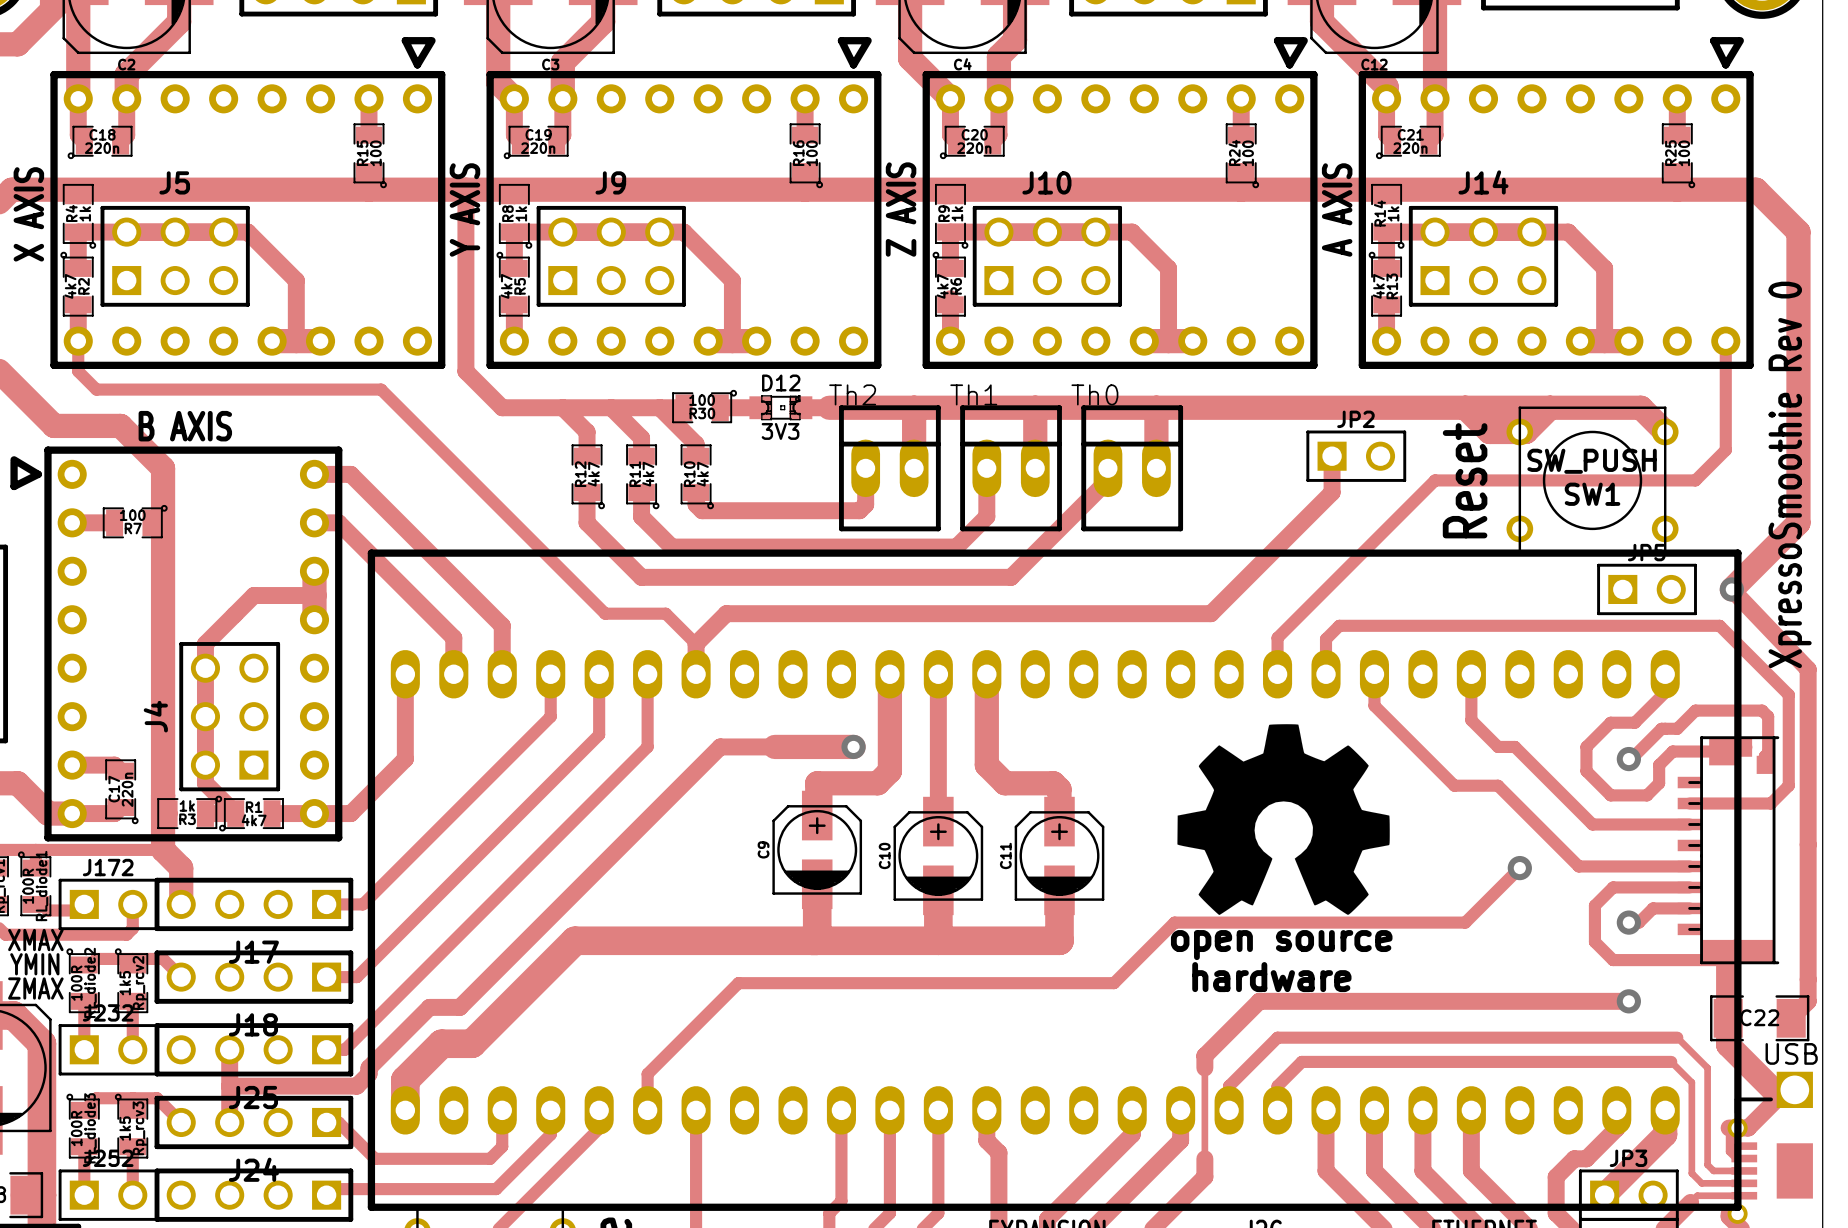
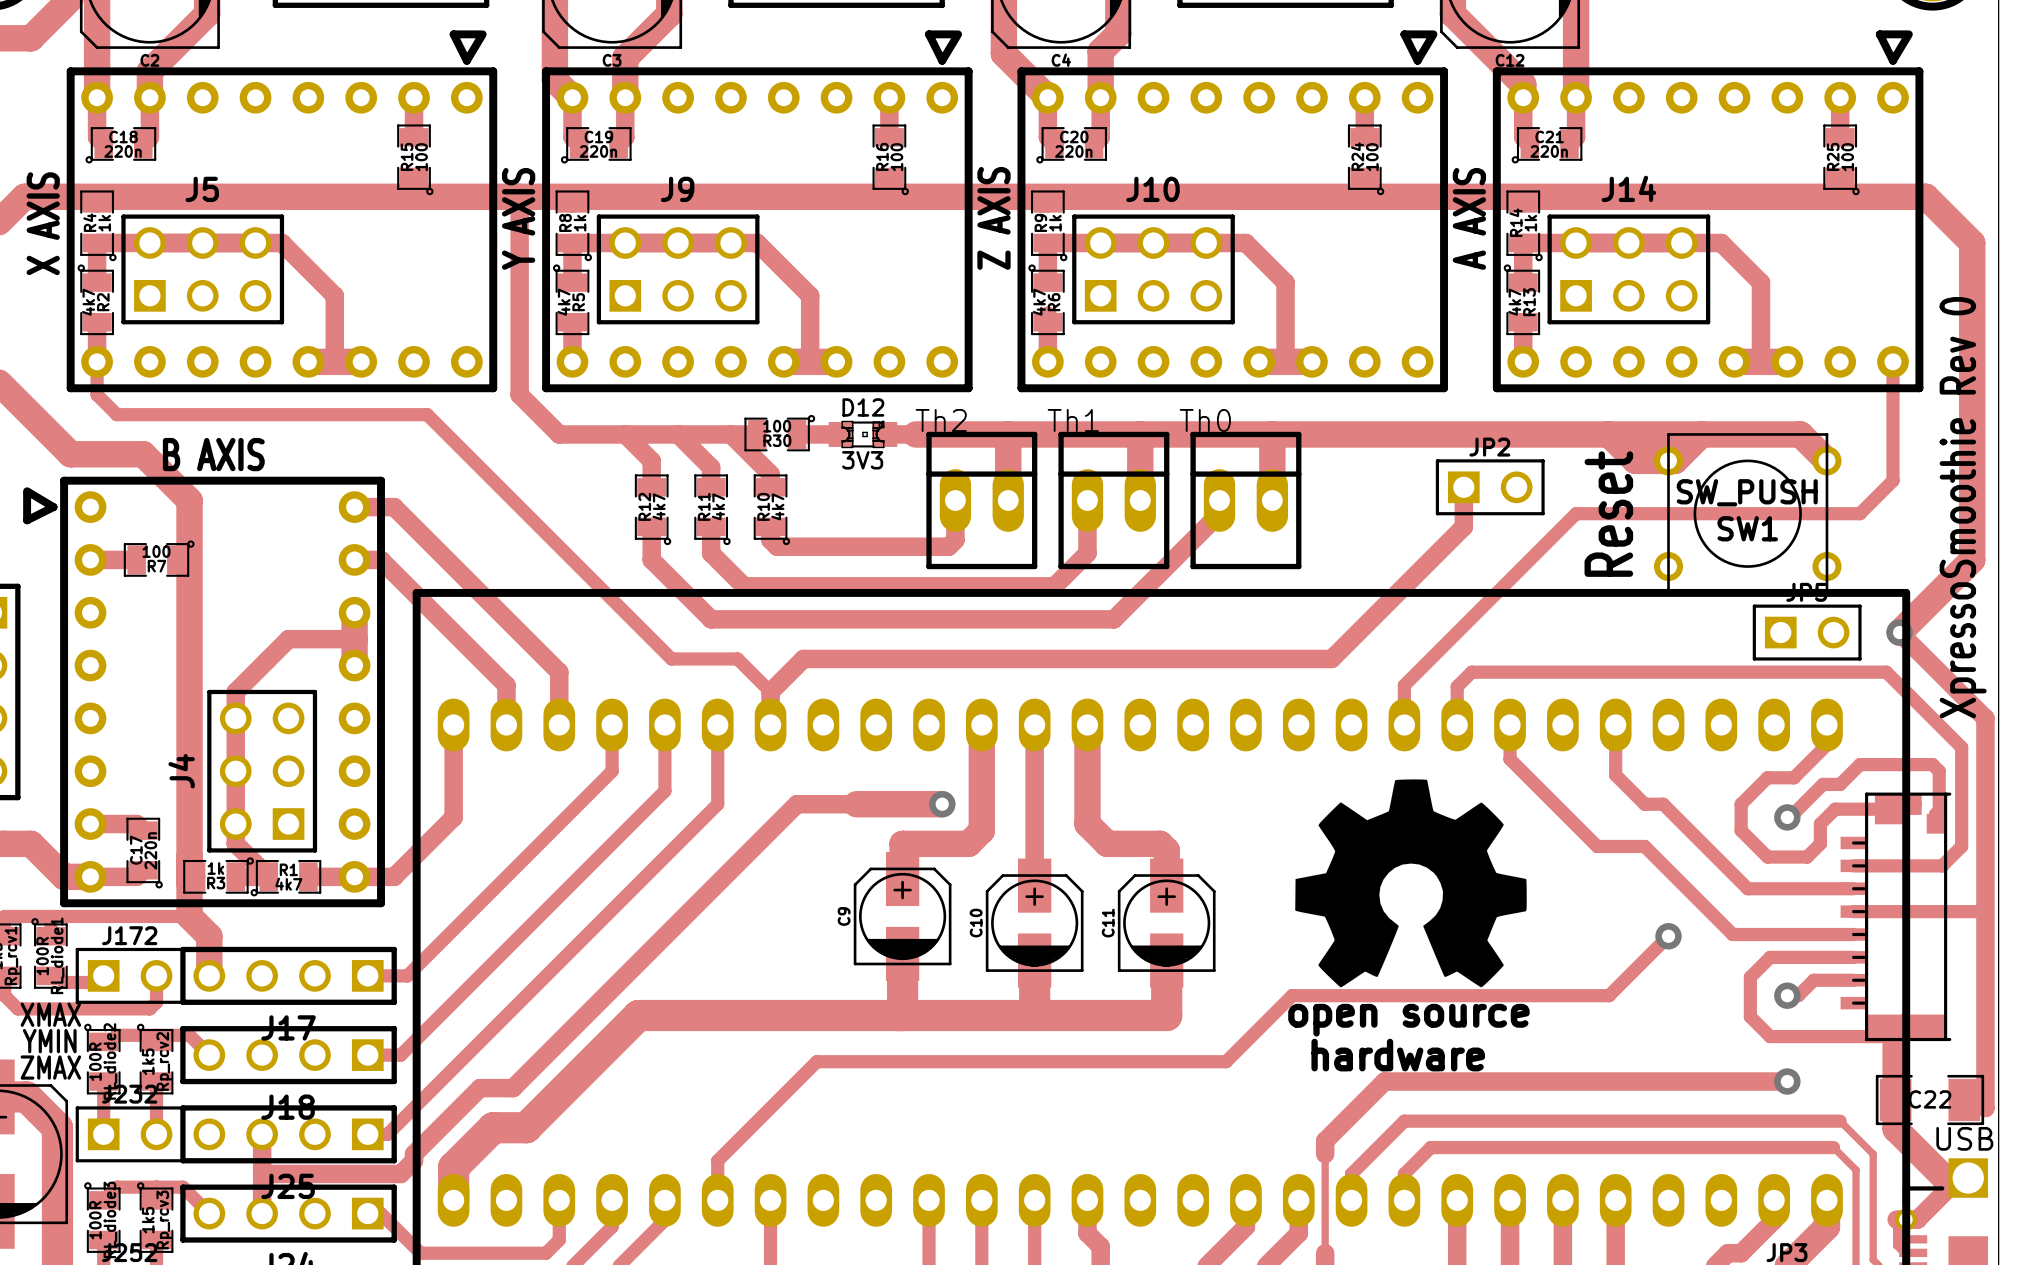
track: (1731, 589) (1808, 669) (1808, 1001) (1791, 1018) -> (1899, 632) (1985, 718) (1985, 1107) (1977, 1100) (1964, 1100)
track: none -> (1985, 909) (1985, 911) (1853, 911)

